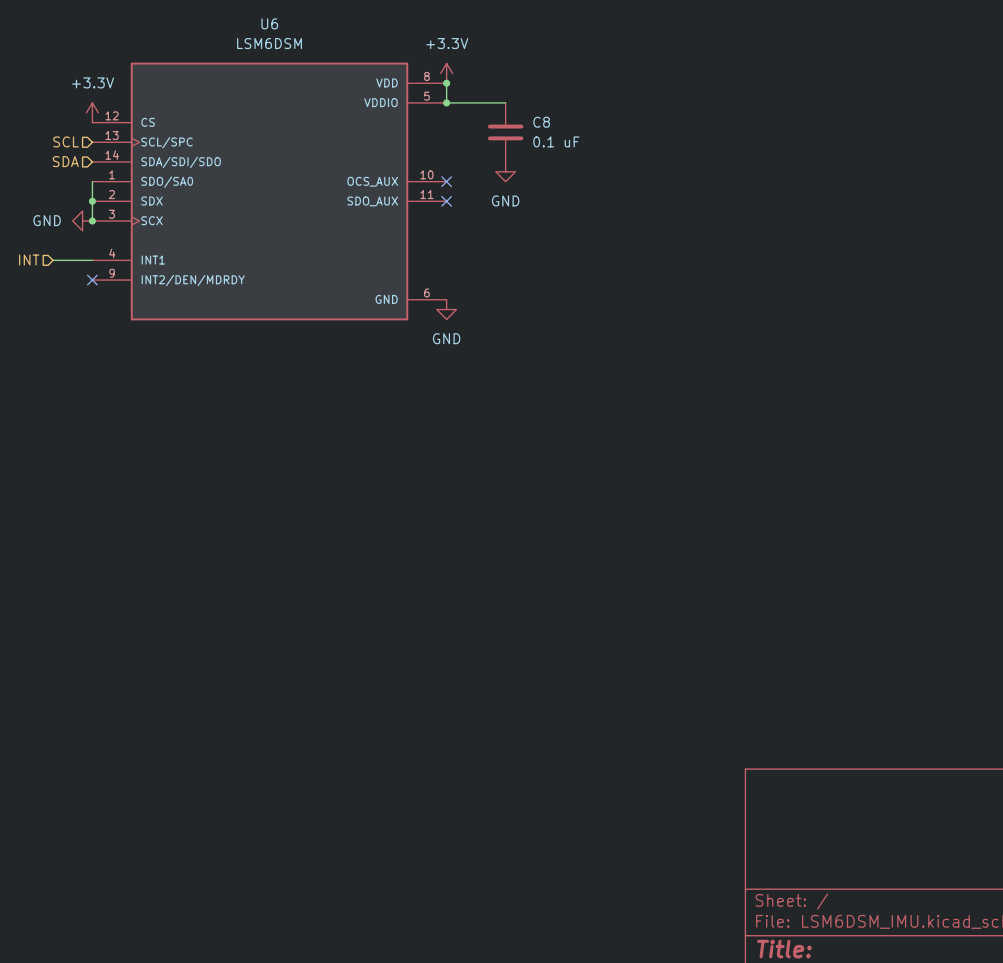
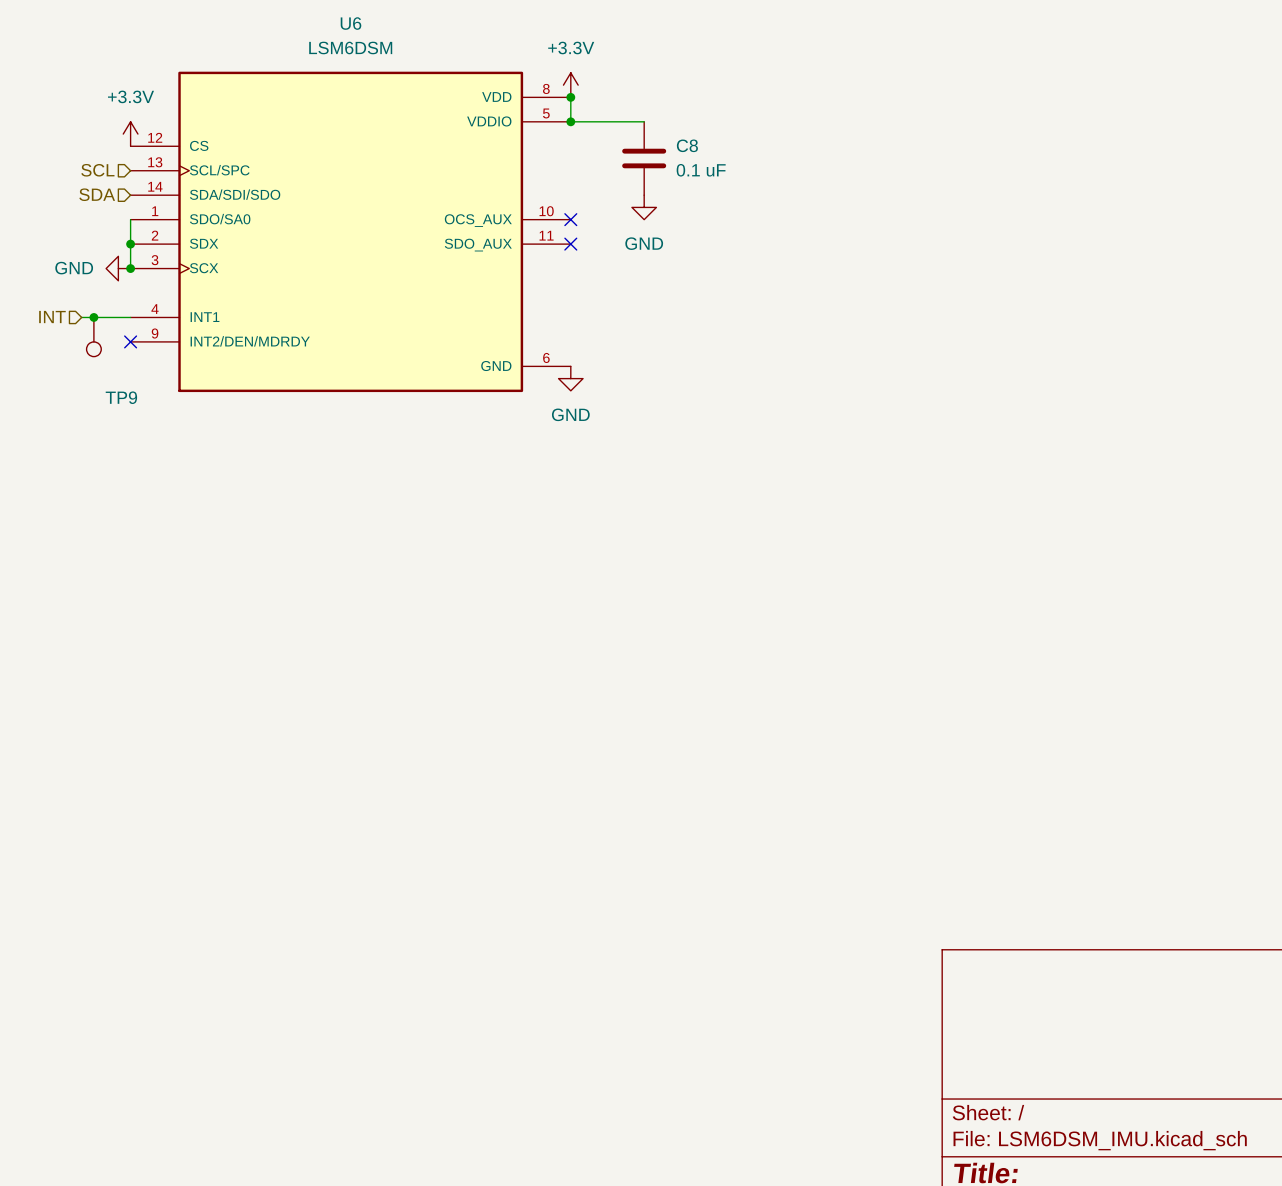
junction: none -> (93, 317)
TP9: none -> (93, 337)

